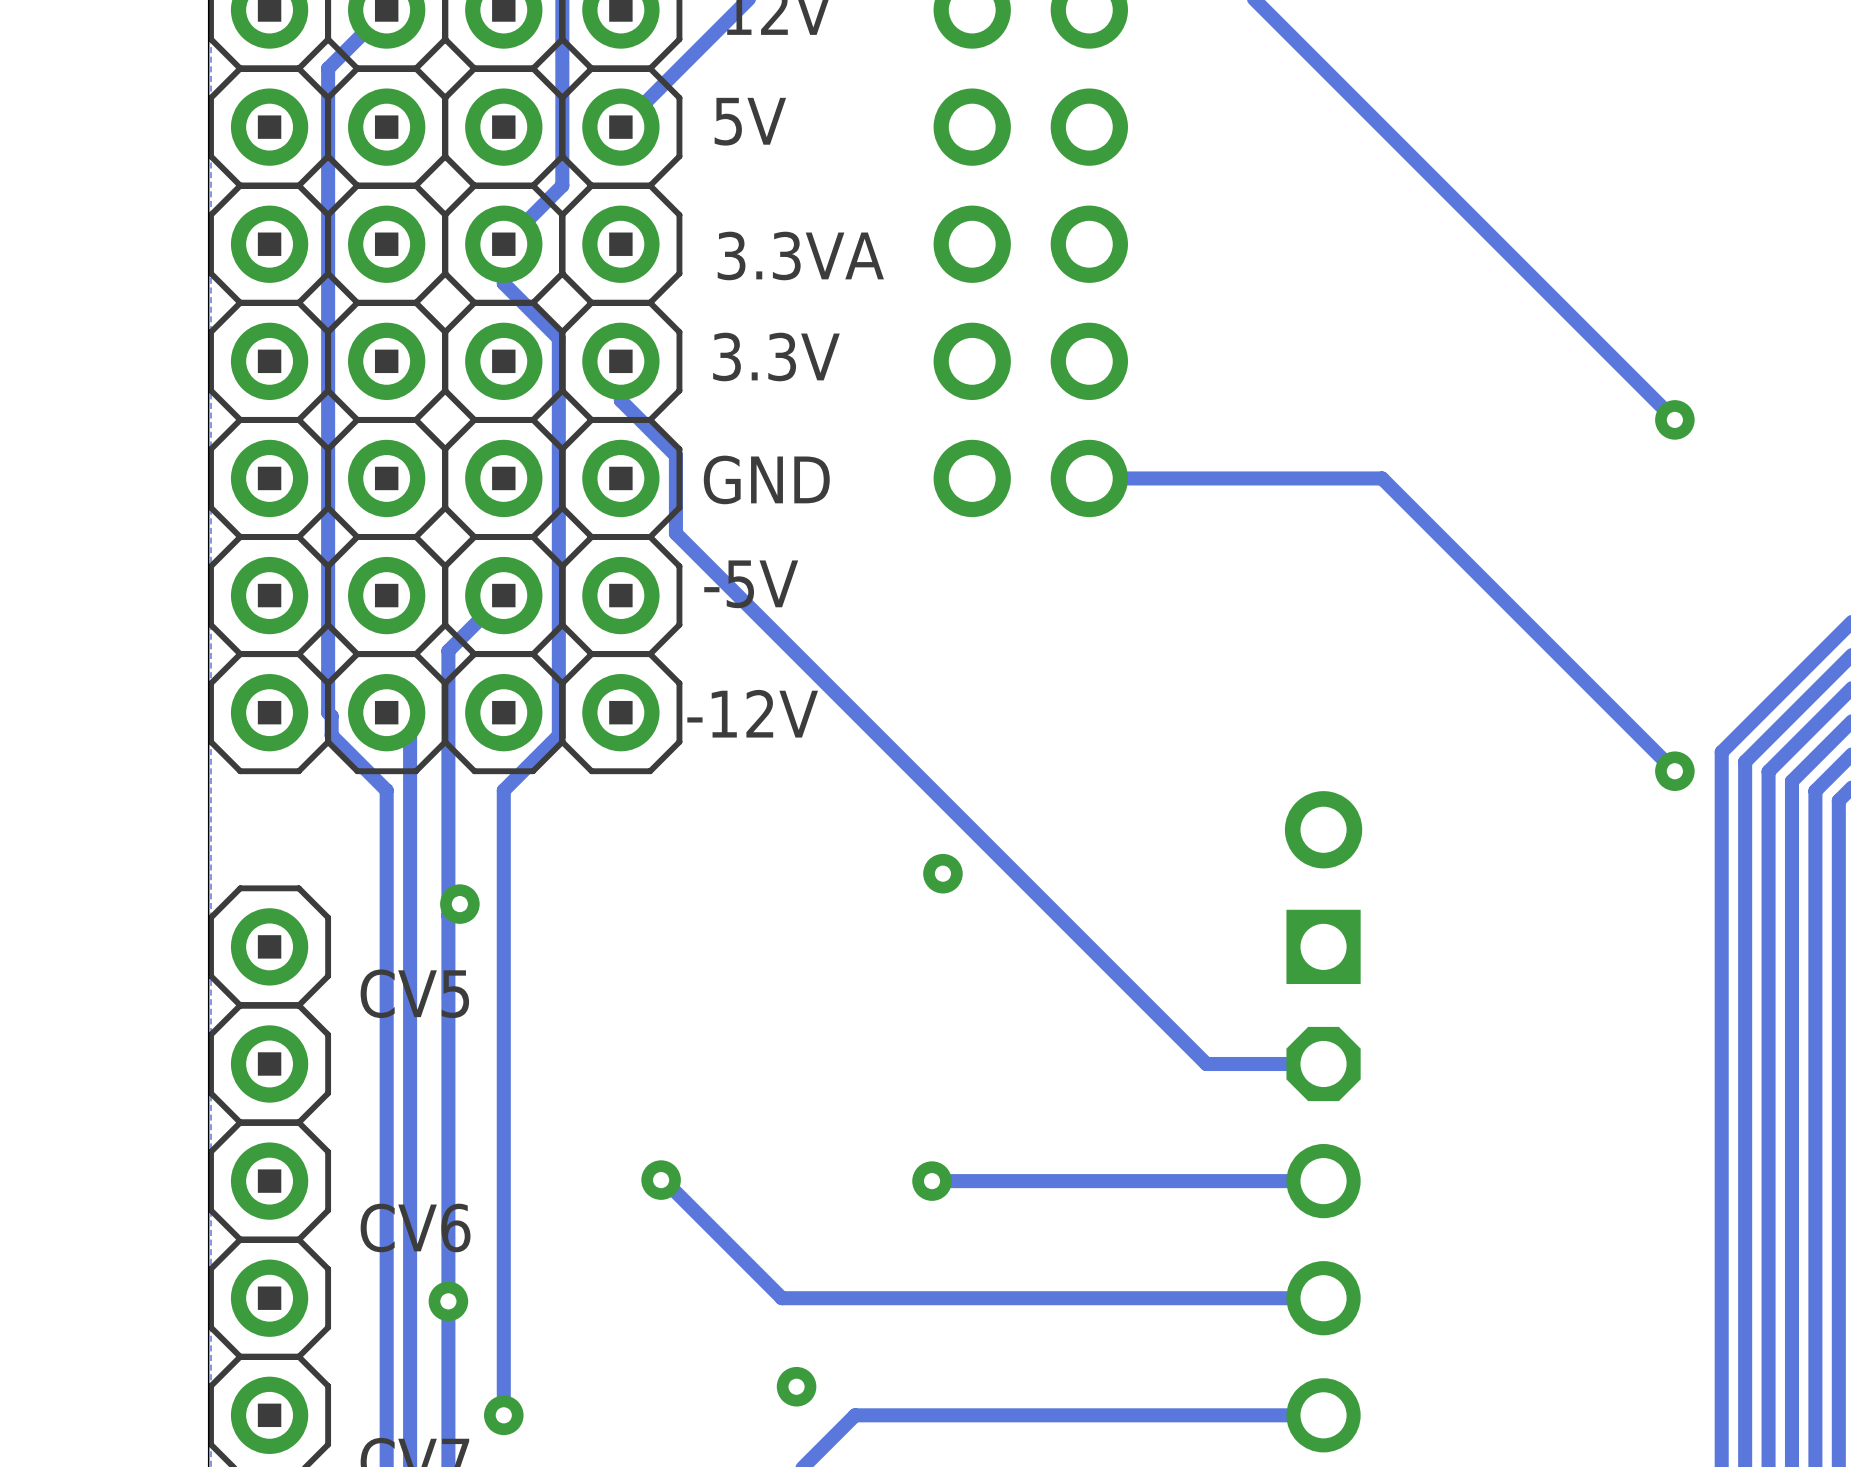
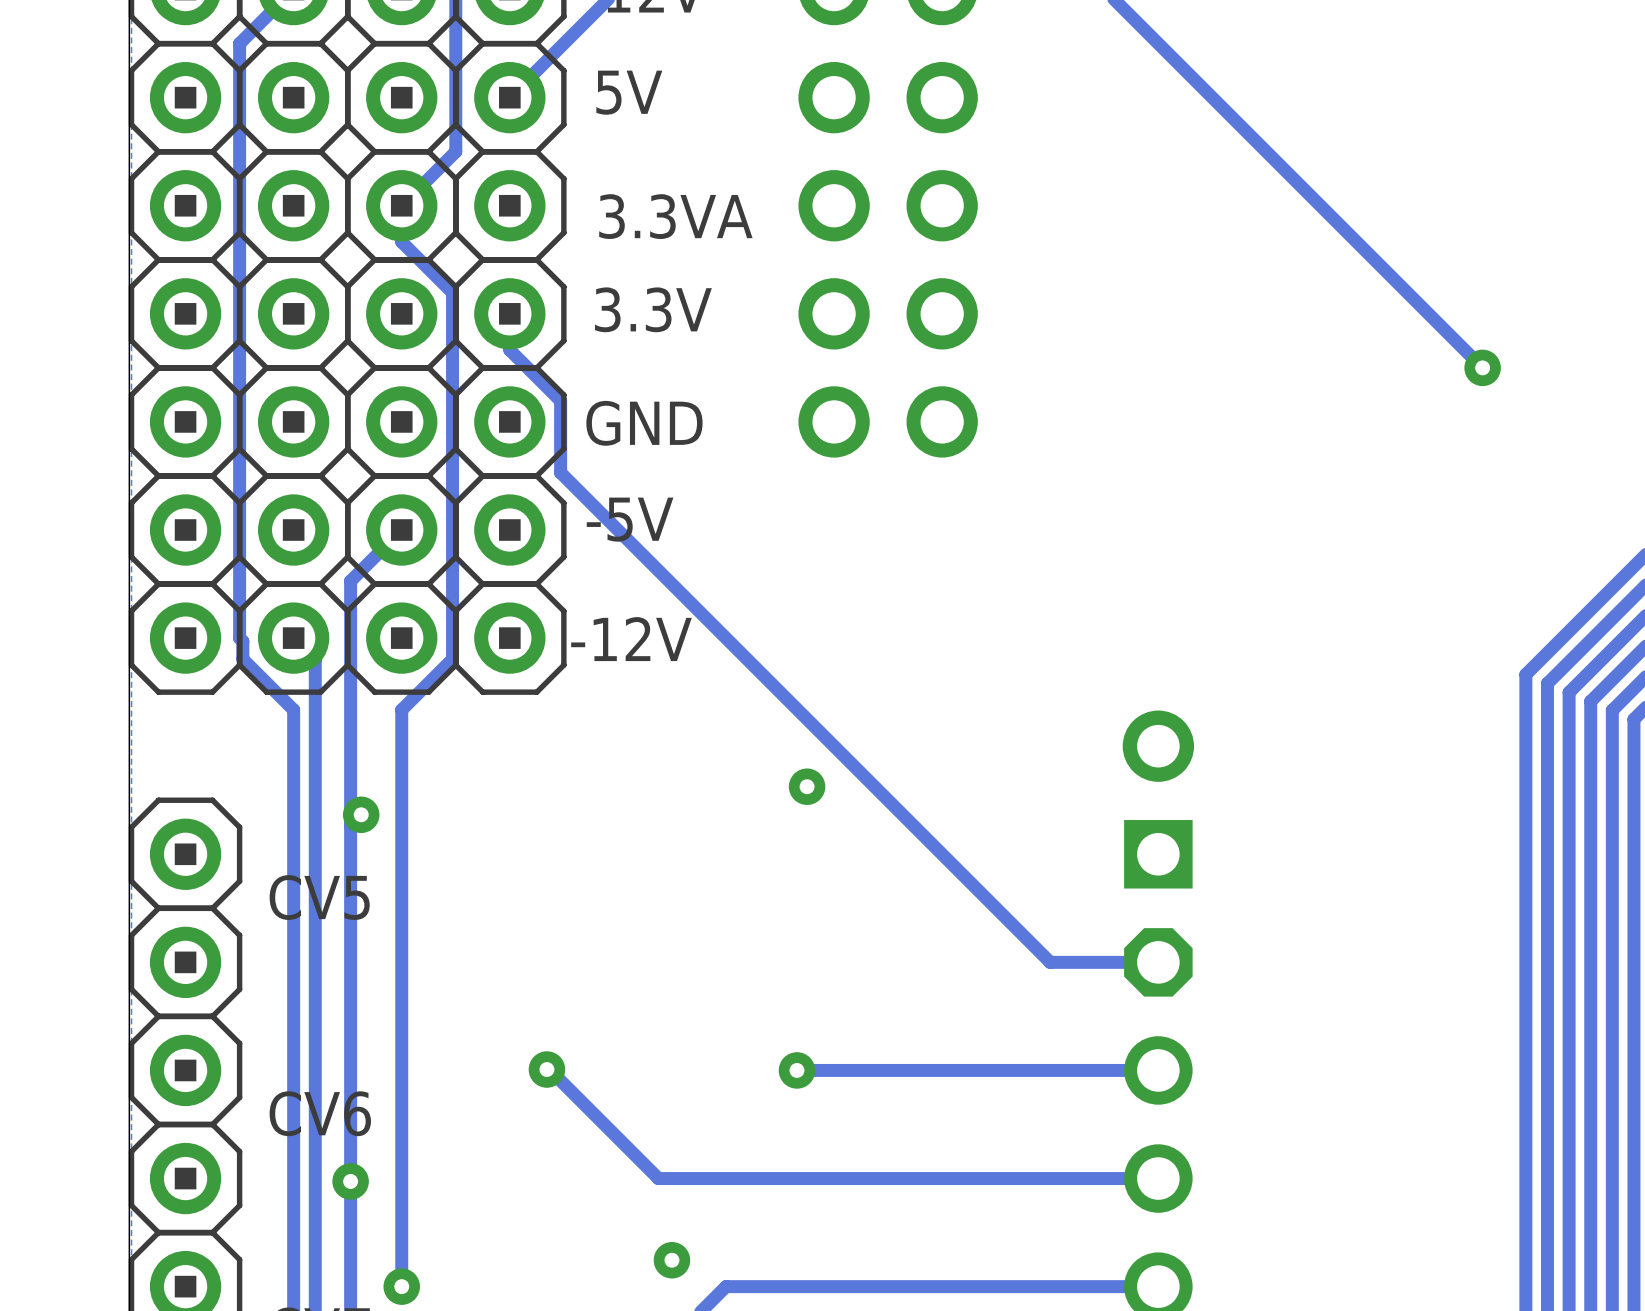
track: (1089, 478) (1382, 478) (1674, 771) -> none
via: (1674, 771) -> none

